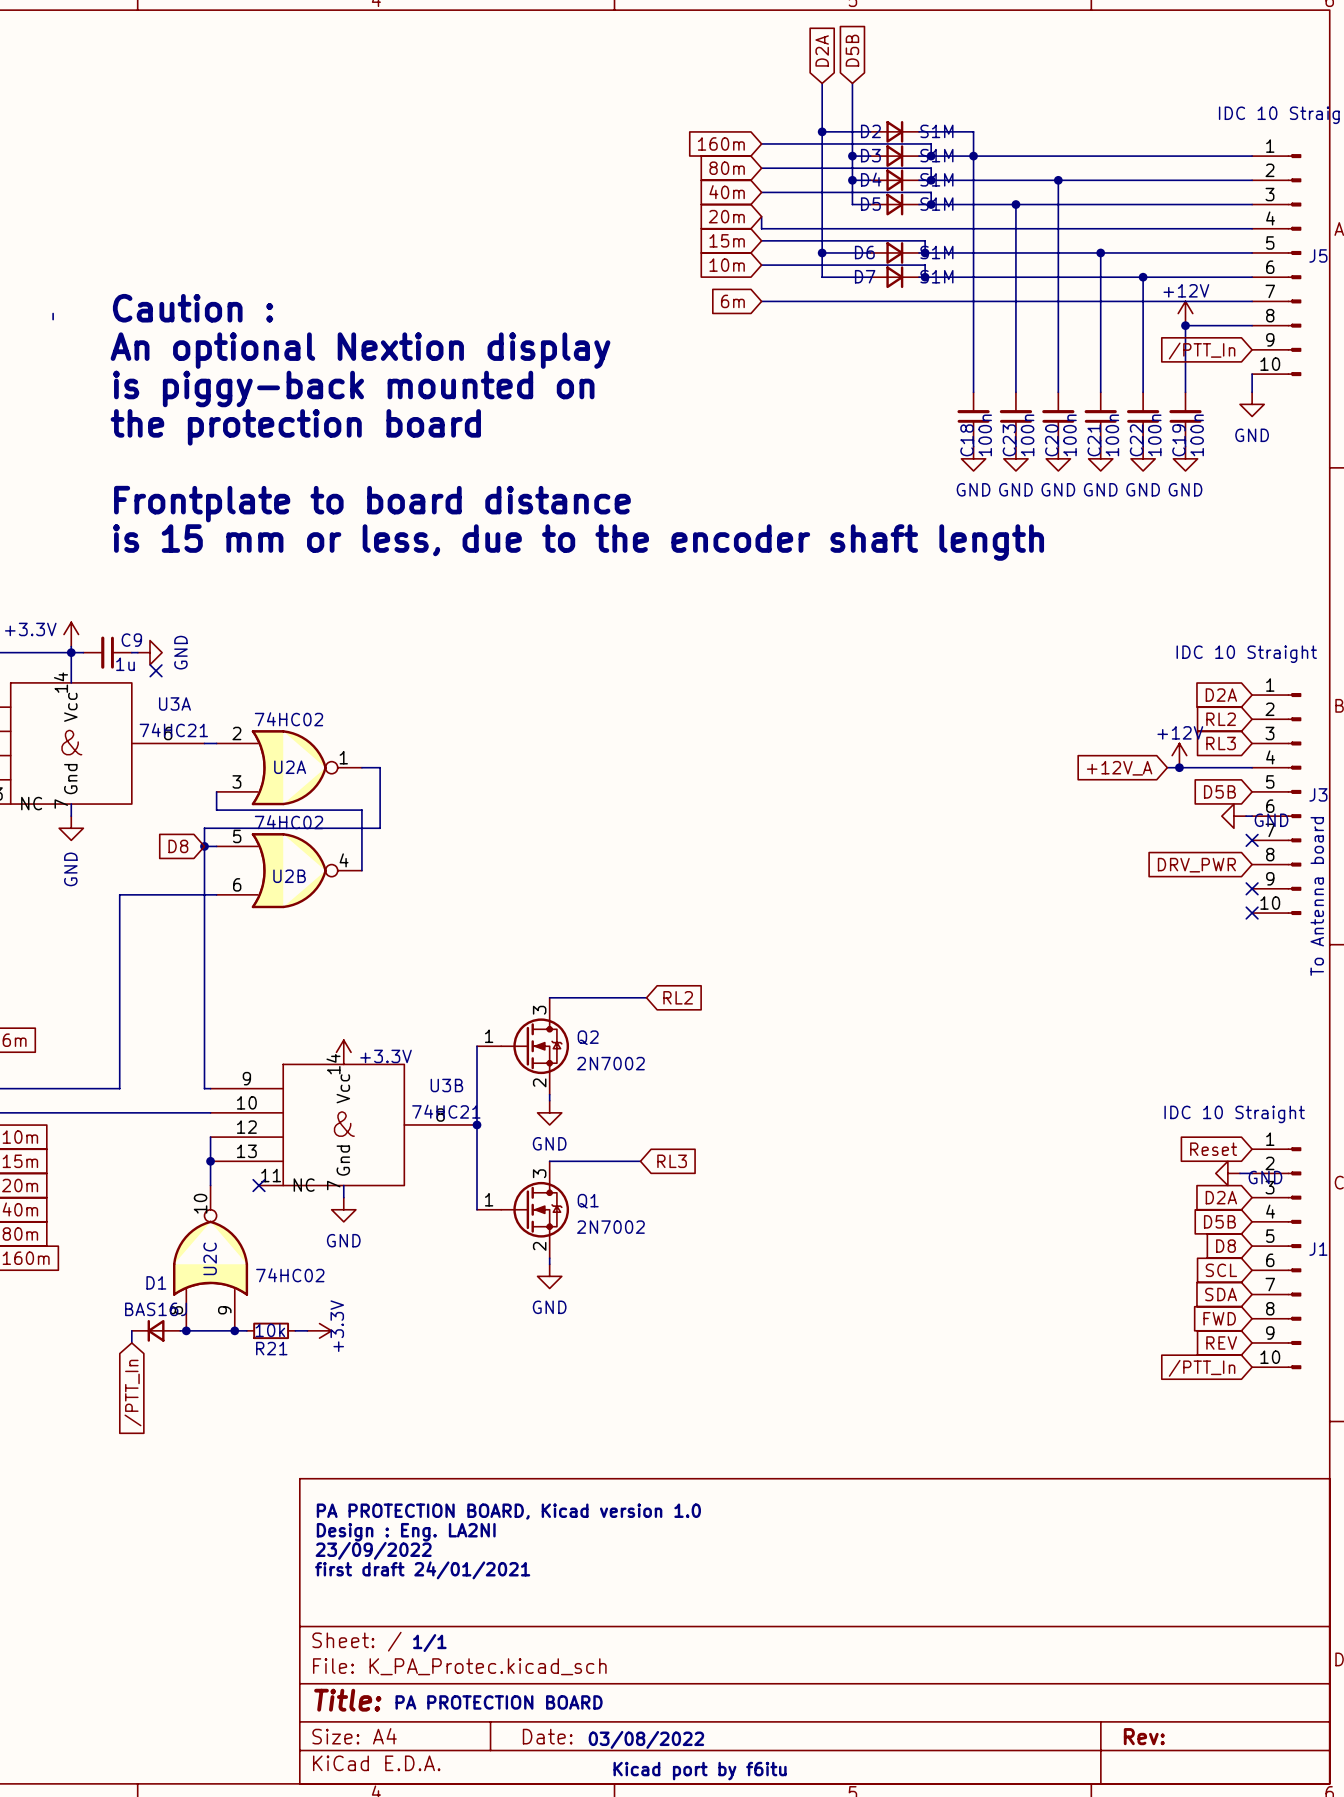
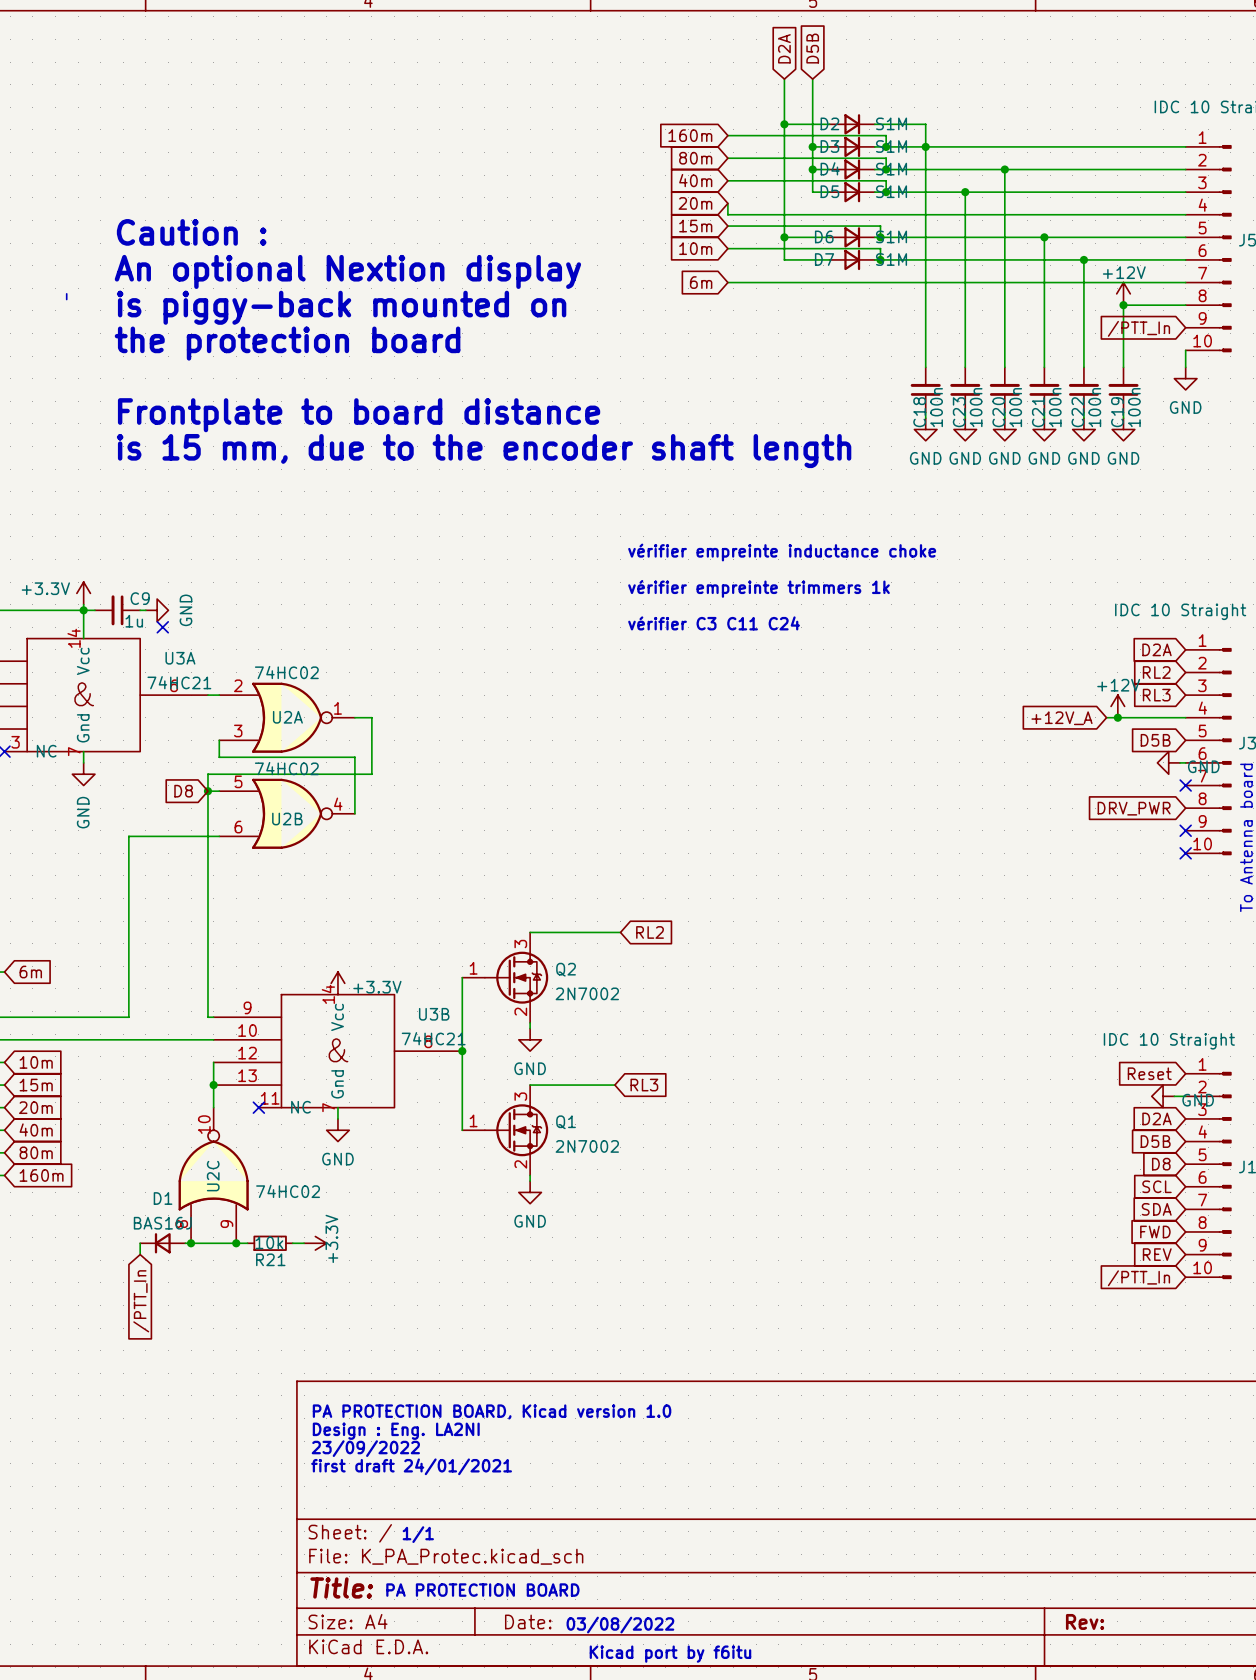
text position: Caution : (193, 308) -> Caution : (191, 232)
text position: An optional Nextion display (360, 350) -> An optional Nextion display (347, 271)
text position: is piggy-back mounted on (353, 388) -> is piggy-back mounted on (341, 307)
text position: the protection board (295, 427) -> the protection board (287, 343)
text: none -> is 15 mm, due to the encoder shaft length (484, 451)
text position: Frontplate to board distance (372, 504) -> Frontplate to board distance (359, 415)
text: is 15 mm or less, due to the encoder shaft length (578, 542) -> none
text: none -> vérifier empreinte inductance choke (782, 552)
text: none -> vérifier empreinte trimmers 1k (759, 588)
text: none -> vérifier C3 C11 C24 (714, 623)

